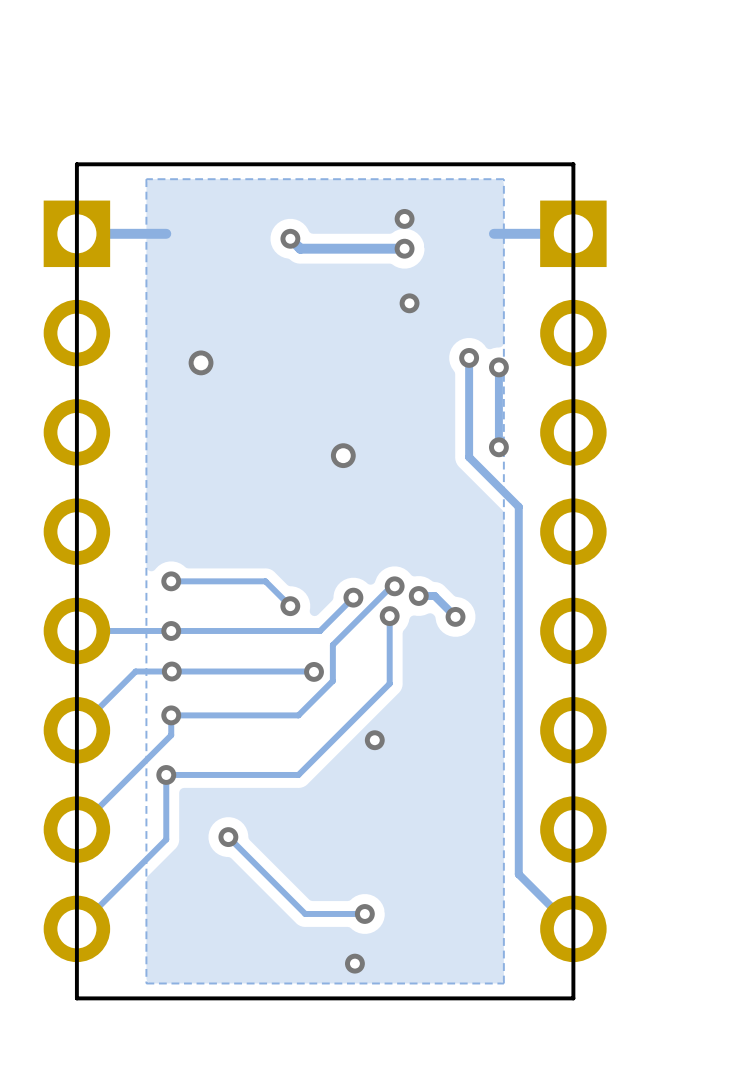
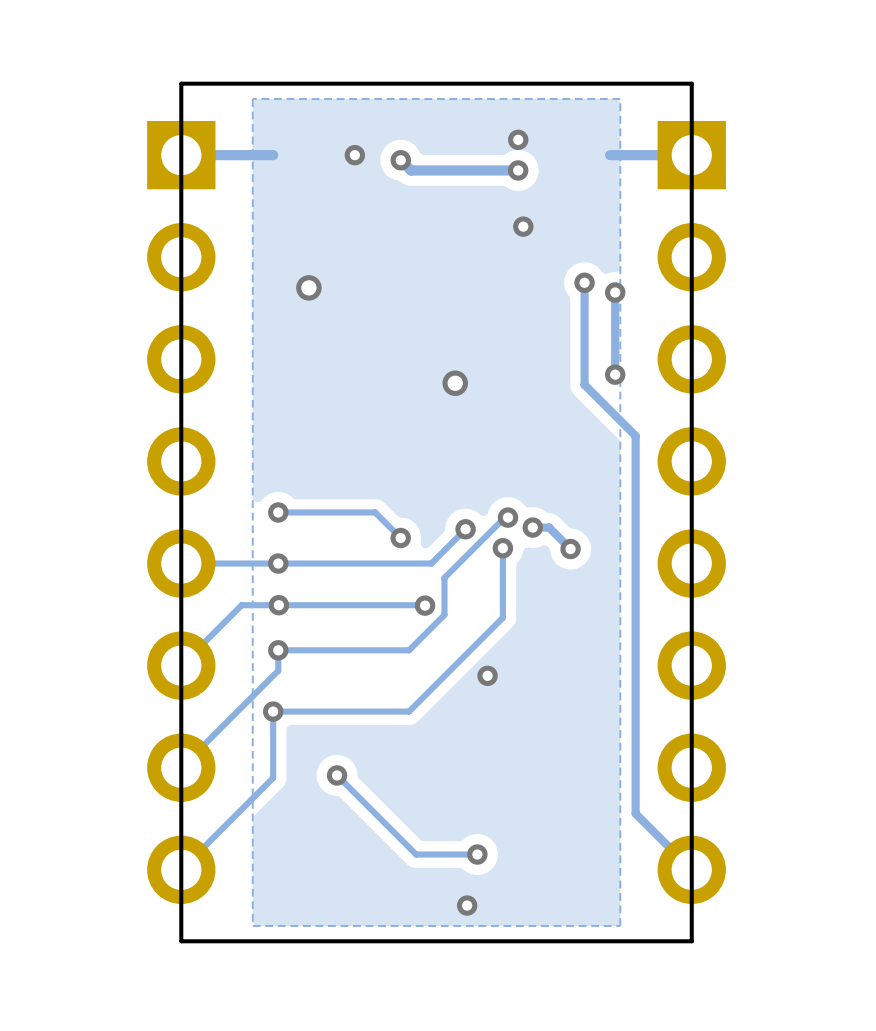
via: none -> (354, 155)

